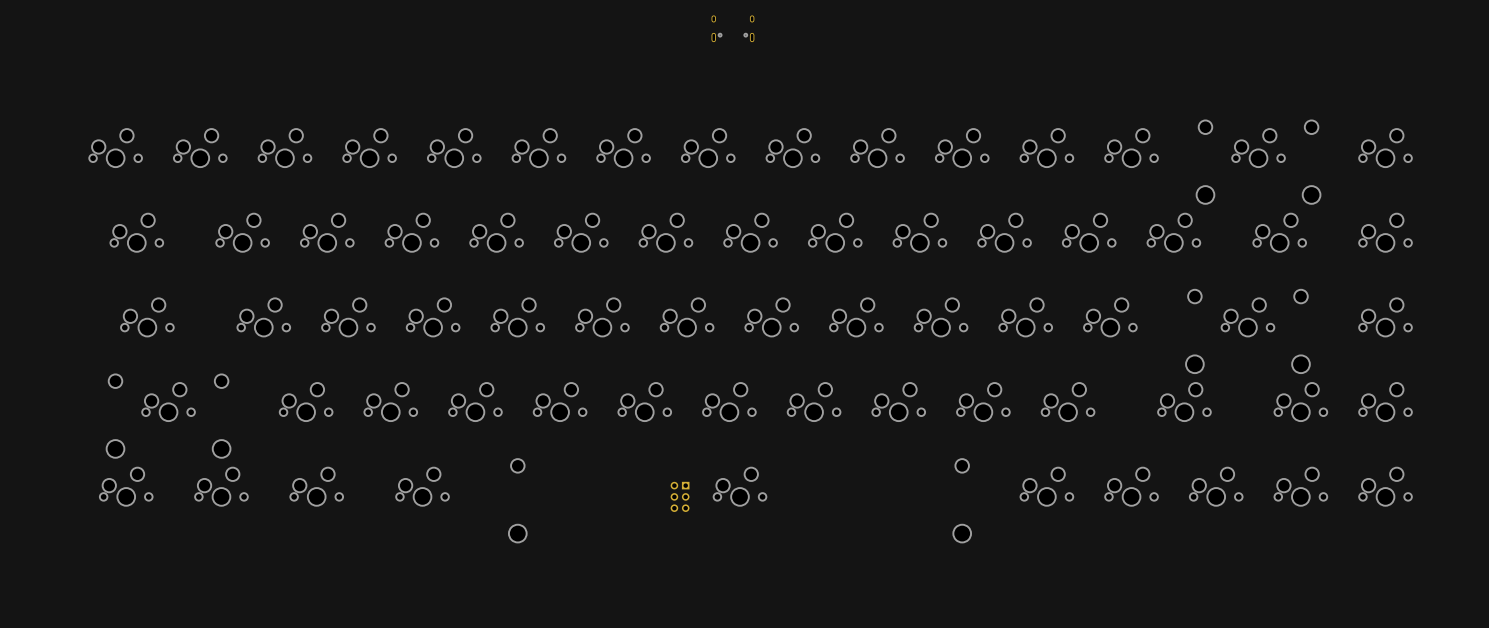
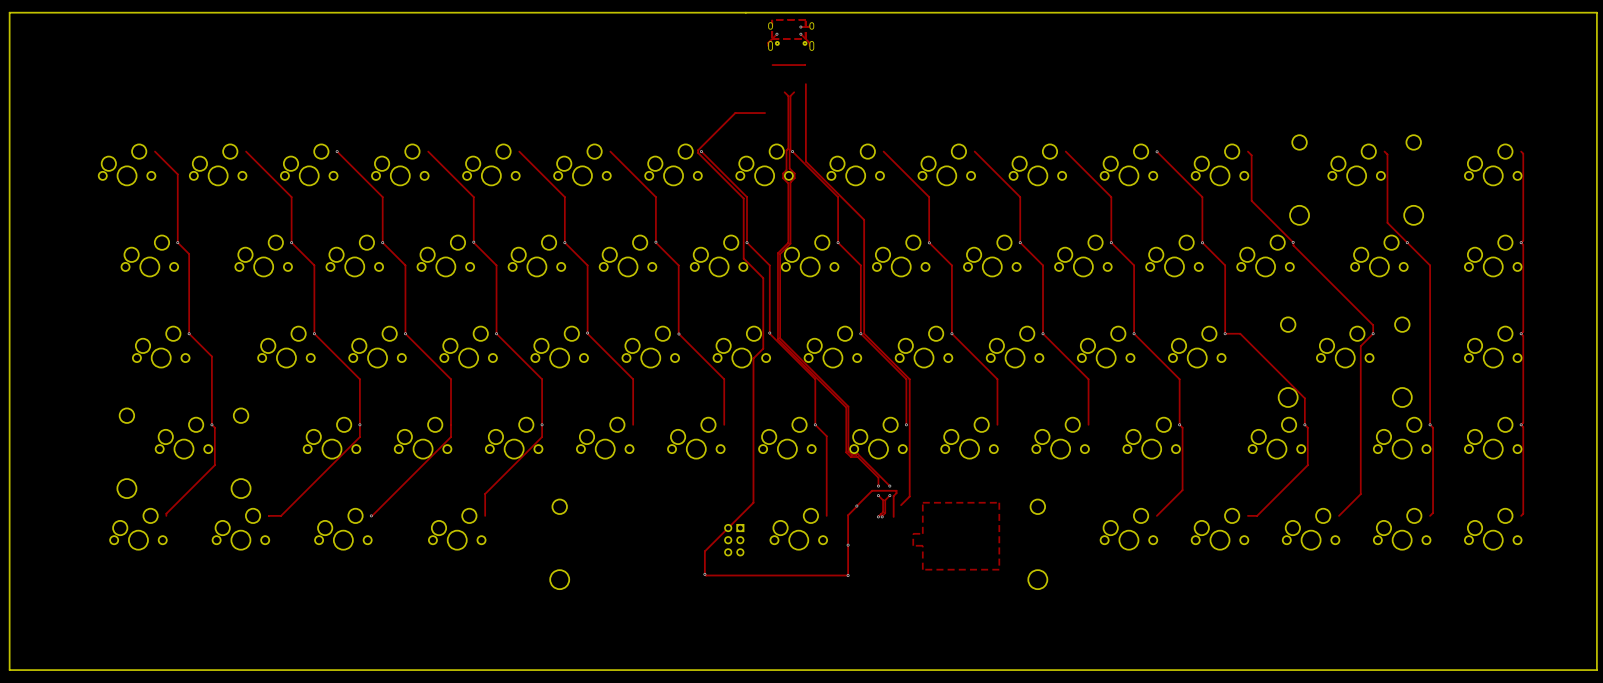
board edge: none -> (9, 12) (9, 670) (1596, 670) (1596, 12) (9, 12)
zone outline: none -> (772, 19) (772, 38) (805, 38) (805, 19) (772, 19)
track: none -> (809, 25) (800, 27)
via: none -> (800, 27)
track: none -> (776, 34) (768, 42) (768, 45)
via: none -> (776, 34)
track: none -> (800, 34) (809, 42) (809, 45)
via: none -> (800, 34)
track: none -> (805, 64) (772, 65)
track: none -> (805, 84) (805, 161) (864, 219) (864, 333) (909, 379) (909, 496) (901, 505)
track: none -> (784, 92) (788, 95) (788, 148) (786, 150) (786, 170) (783, 173) (783, 178) (788, 183) (788, 242) (777, 253) (777, 339) (846, 407) (846, 452) (850, 456) (857, 456) (878, 477) (878, 486)
track: none -> (794, 92) (790, 95) (789, 168) (794, 173) (794, 178) (790, 182) (790, 243) (780, 254) (780, 338) (848, 406) (848, 451) (851, 454) (857, 453) (889, 486)
track: none -> (765, 113) (735, 113) (698, 150) (698, 152) (743, 198) (743, 258) (763, 278) (763, 348) (753, 358) (753, 502) (704, 551) (704, 574) (848, 575) (848, 515) (872, 490) (896, 490) (893, 496) (893, 516)
track: none -> (154, 151) (177, 174) (177, 242) (189, 254) (189, 333) (211, 356) (211, 424) (214, 427) (214, 465) (166, 513) (166, 515)
track: none -> (246, 151) (291, 197) (291, 242) (314, 265) (314, 333) (359, 379) (359, 437) (281, 515) (268, 515)
track: none -> (337, 151) (382, 197) (382, 242) (405, 265) (405, 333) (451, 379) (451, 437) (371, 515)
via: none -> (337, 151)
track: none -> (428, 151) (473, 197) (473, 242) (496, 265) (496, 333) (542, 379) (542, 437) (485, 493) (485, 515)
track: none -> (519, 151) (564, 197) (564, 242) (587, 265) (587, 333) (633, 379) (633, 424)
track: none -> (610, 151) (655, 197) (655, 242) (678, 265) (678, 333) (724, 379) (724, 424)
track: none -> (701, 151) (747, 197) (747, 242) (769, 265) (769, 333) (815, 379) (815, 424) (826, 436) (826, 515)
via: none -> (701, 151)
track: none -> (792, 151) (838, 197) (838, 242) (860, 265) (860, 333) (906, 379) (906, 424)
via: none -> (792, 151)
track: none -> (883, 151) (929, 197) (929, 242) (951, 265) (951, 333) (997, 379) (997, 424)
track: none -> (974, 151) (1020, 197) (1020, 242) (1043, 265) (1043, 333) (1088, 379) (1088, 424)
track: none -> (1065, 151) (1111, 197) (1111, 242) (1134, 265) (1134, 333) (1179, 379) (1179, 424) (1182, 427) (1182, 490) (1156, 515)
track: none -> (1156, 151) (1202, 197) (1202, 242) (1225, 265) (1225, 333) (1240, 333) (1304, 398) (1304, 424) (1307, 427) (1307, 465) (1257, 515) (1247, 515)
via: none -> (1157, 151)
track: none -> (1247, 151) (1251, 155) (1251, 200) (1373, 325) (1373, 333) (1360, 346) (1360, 494) (1339, 515)
track: none -> (1384, 151) (1387, 154) (1387, 222) (1430, 265) (1430, 424) (1433, 427) (1433, 512) (1430, 515)
track: none -> (1521, 151) (1523, 153) (1523, 240) (1521, 242) (1523, 244) (1523, 331) (1521, 333) (1523, 335) (1523, 422) (1521, 424) (1523, 426) (1523, 513) (1521, 515)
via: none -> (473, 242)
via: none -> (655, 242)
via: none -> (177, 242)
via: none -> (291, 242)
via: none -> (382, 242)
via: none -> (564, 242)
via: none -> (747, 242)
via: none -> (838, 242)
via: none -> (929, 242)
via: none -> (1020, 242)
via: none -> (1111, 242)
via: none -> (1202, 242)
via: none -> (1293, 242)
via: none -> (1407, 242)
via: none -> (1521, 242)
via: none -> (587, 333)
via: none -> (769, 333)
via: none -> (189, 333)
via: none -> (314, 333)
via: none -> (405, 333)
via: none -> (496, 333)
via: none -> (678, 334)
via: none -> (860, 333)
via: none -> (951, 333)
via: none -> (1043, 333)
via: none -> (1134, 333)
via: none -> (1225, 333)
via: none -> (1373, 333)
via: none -> (1521, 333)
via: none -> (211, 424)
via: none -> (359, 424)
via: none -> (542, 424)
via: none -> (815, 424)
via: none -> (906, 424)
via: none -> (1179, 424)
via: none -> (1304, 424)
via: none -> (1430, 424)
via: none -> (1521, 424)
via: none -> (878, 486)
via: none -> (889, 486)
track: none -> (878, 495) (883, 500) (883, 512) (878, 516)
via: none -> (878, 495)
track: none -> (889, 495) (885, 500) (885, 513) (882, 516)
via: none -> (889, 495)
zone outline: none -> (922, 502) (922, 533) (913, 533) (913, 545) (922, 545) (922, 569) (999, 569) (999, 502) (922, 502)
via: none -> (856, 506)
via: none -> (371, 515)
via: none -> (878, 516)
via: none -> (882, 516)
via: none -> (848, 545)
via: none -> (704, 574)
via: none -> (848, 575)

